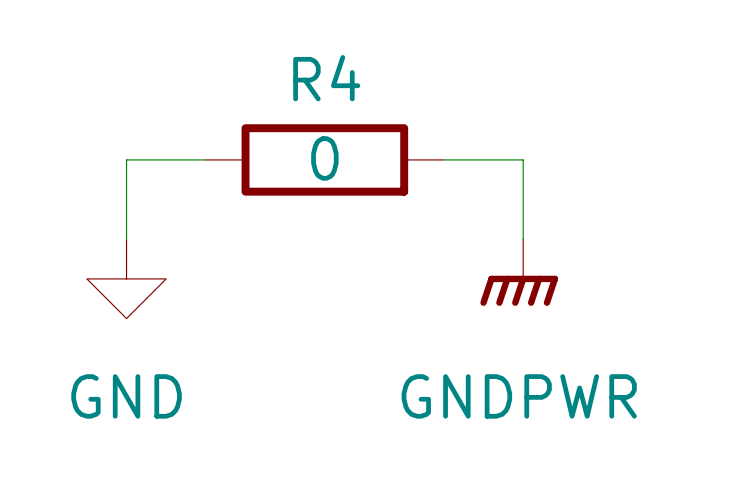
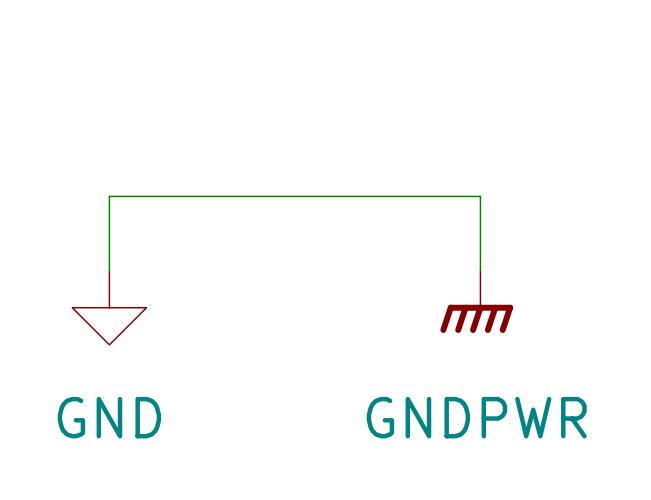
wire: none -> (183, 196) (406, 196)
R4: 0 (324, 159) -> none

